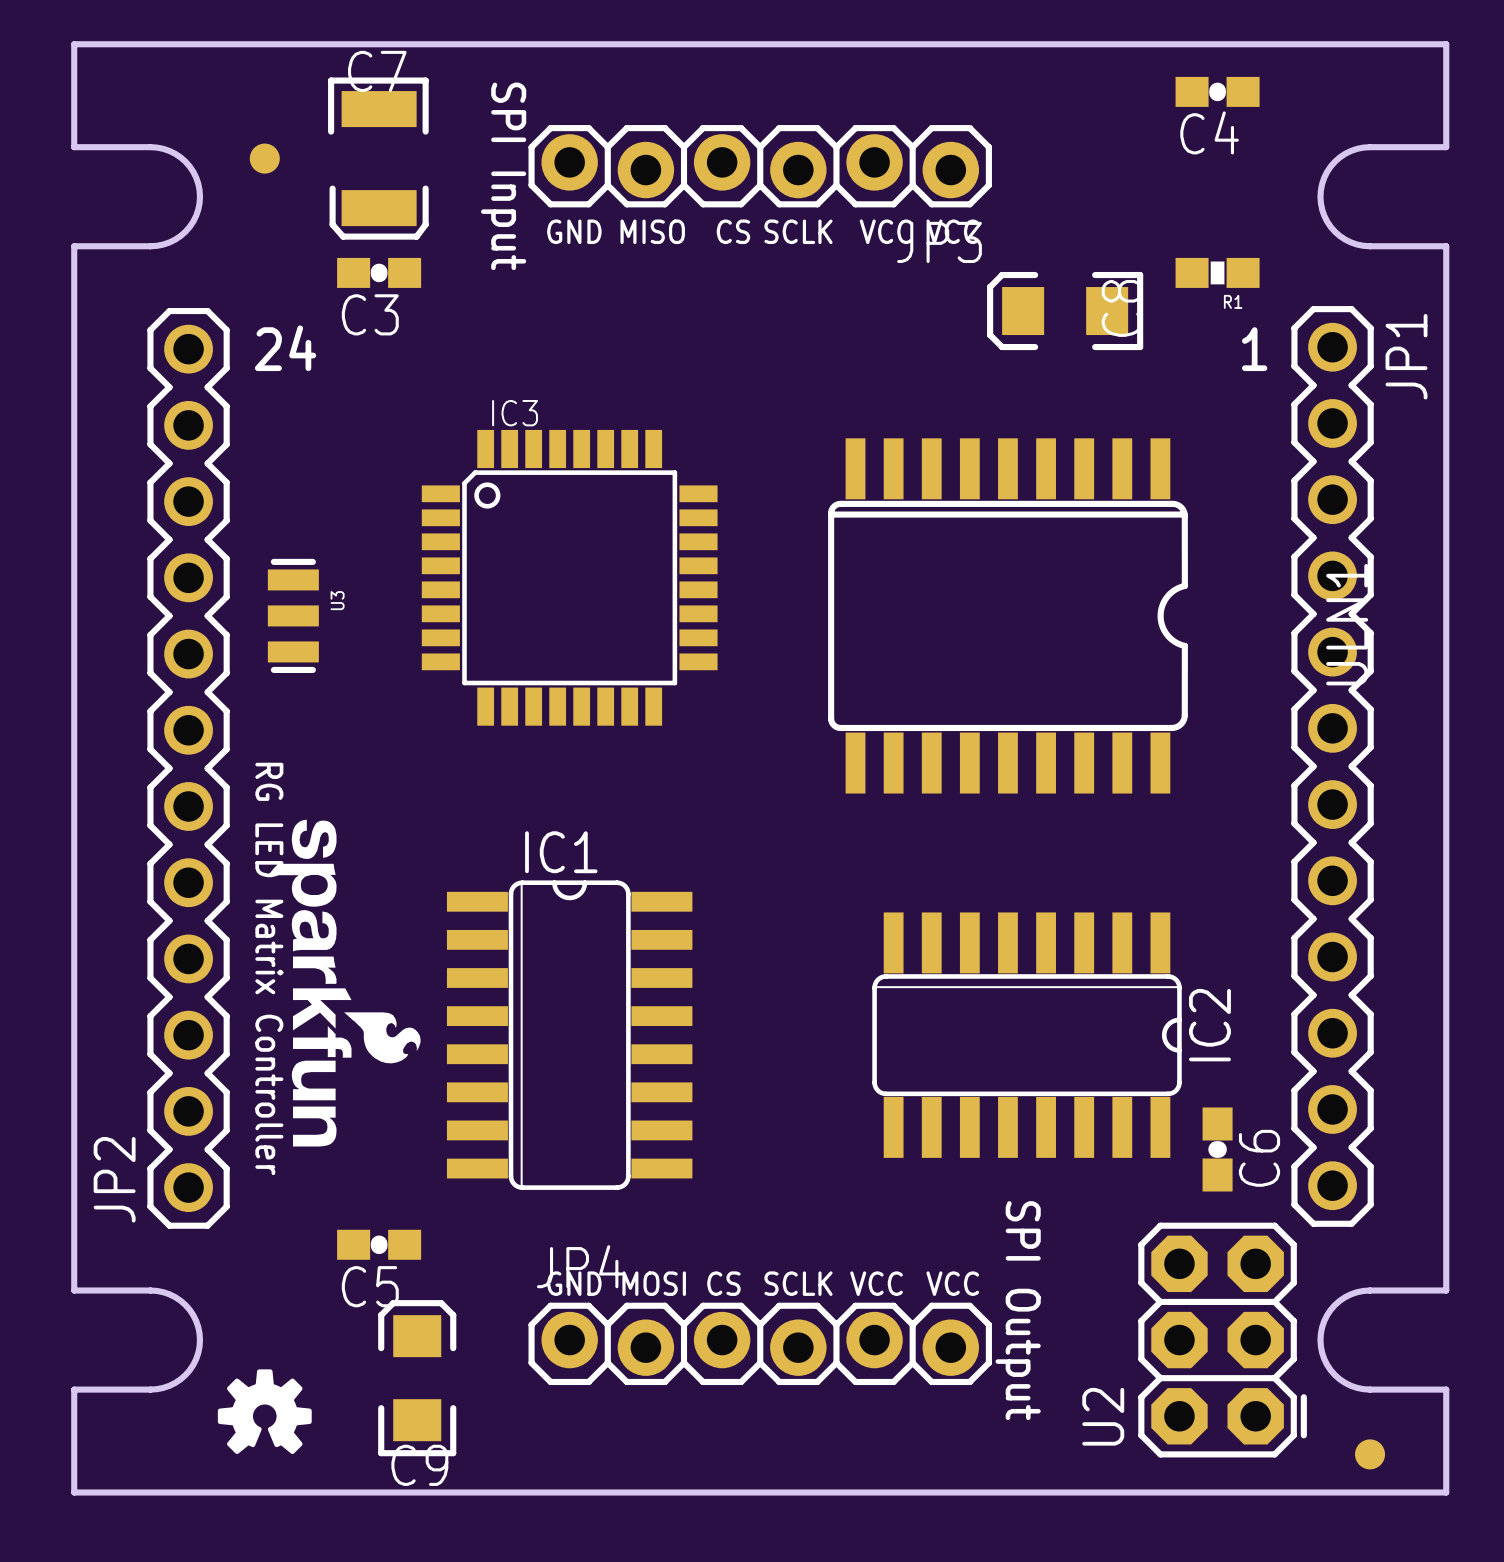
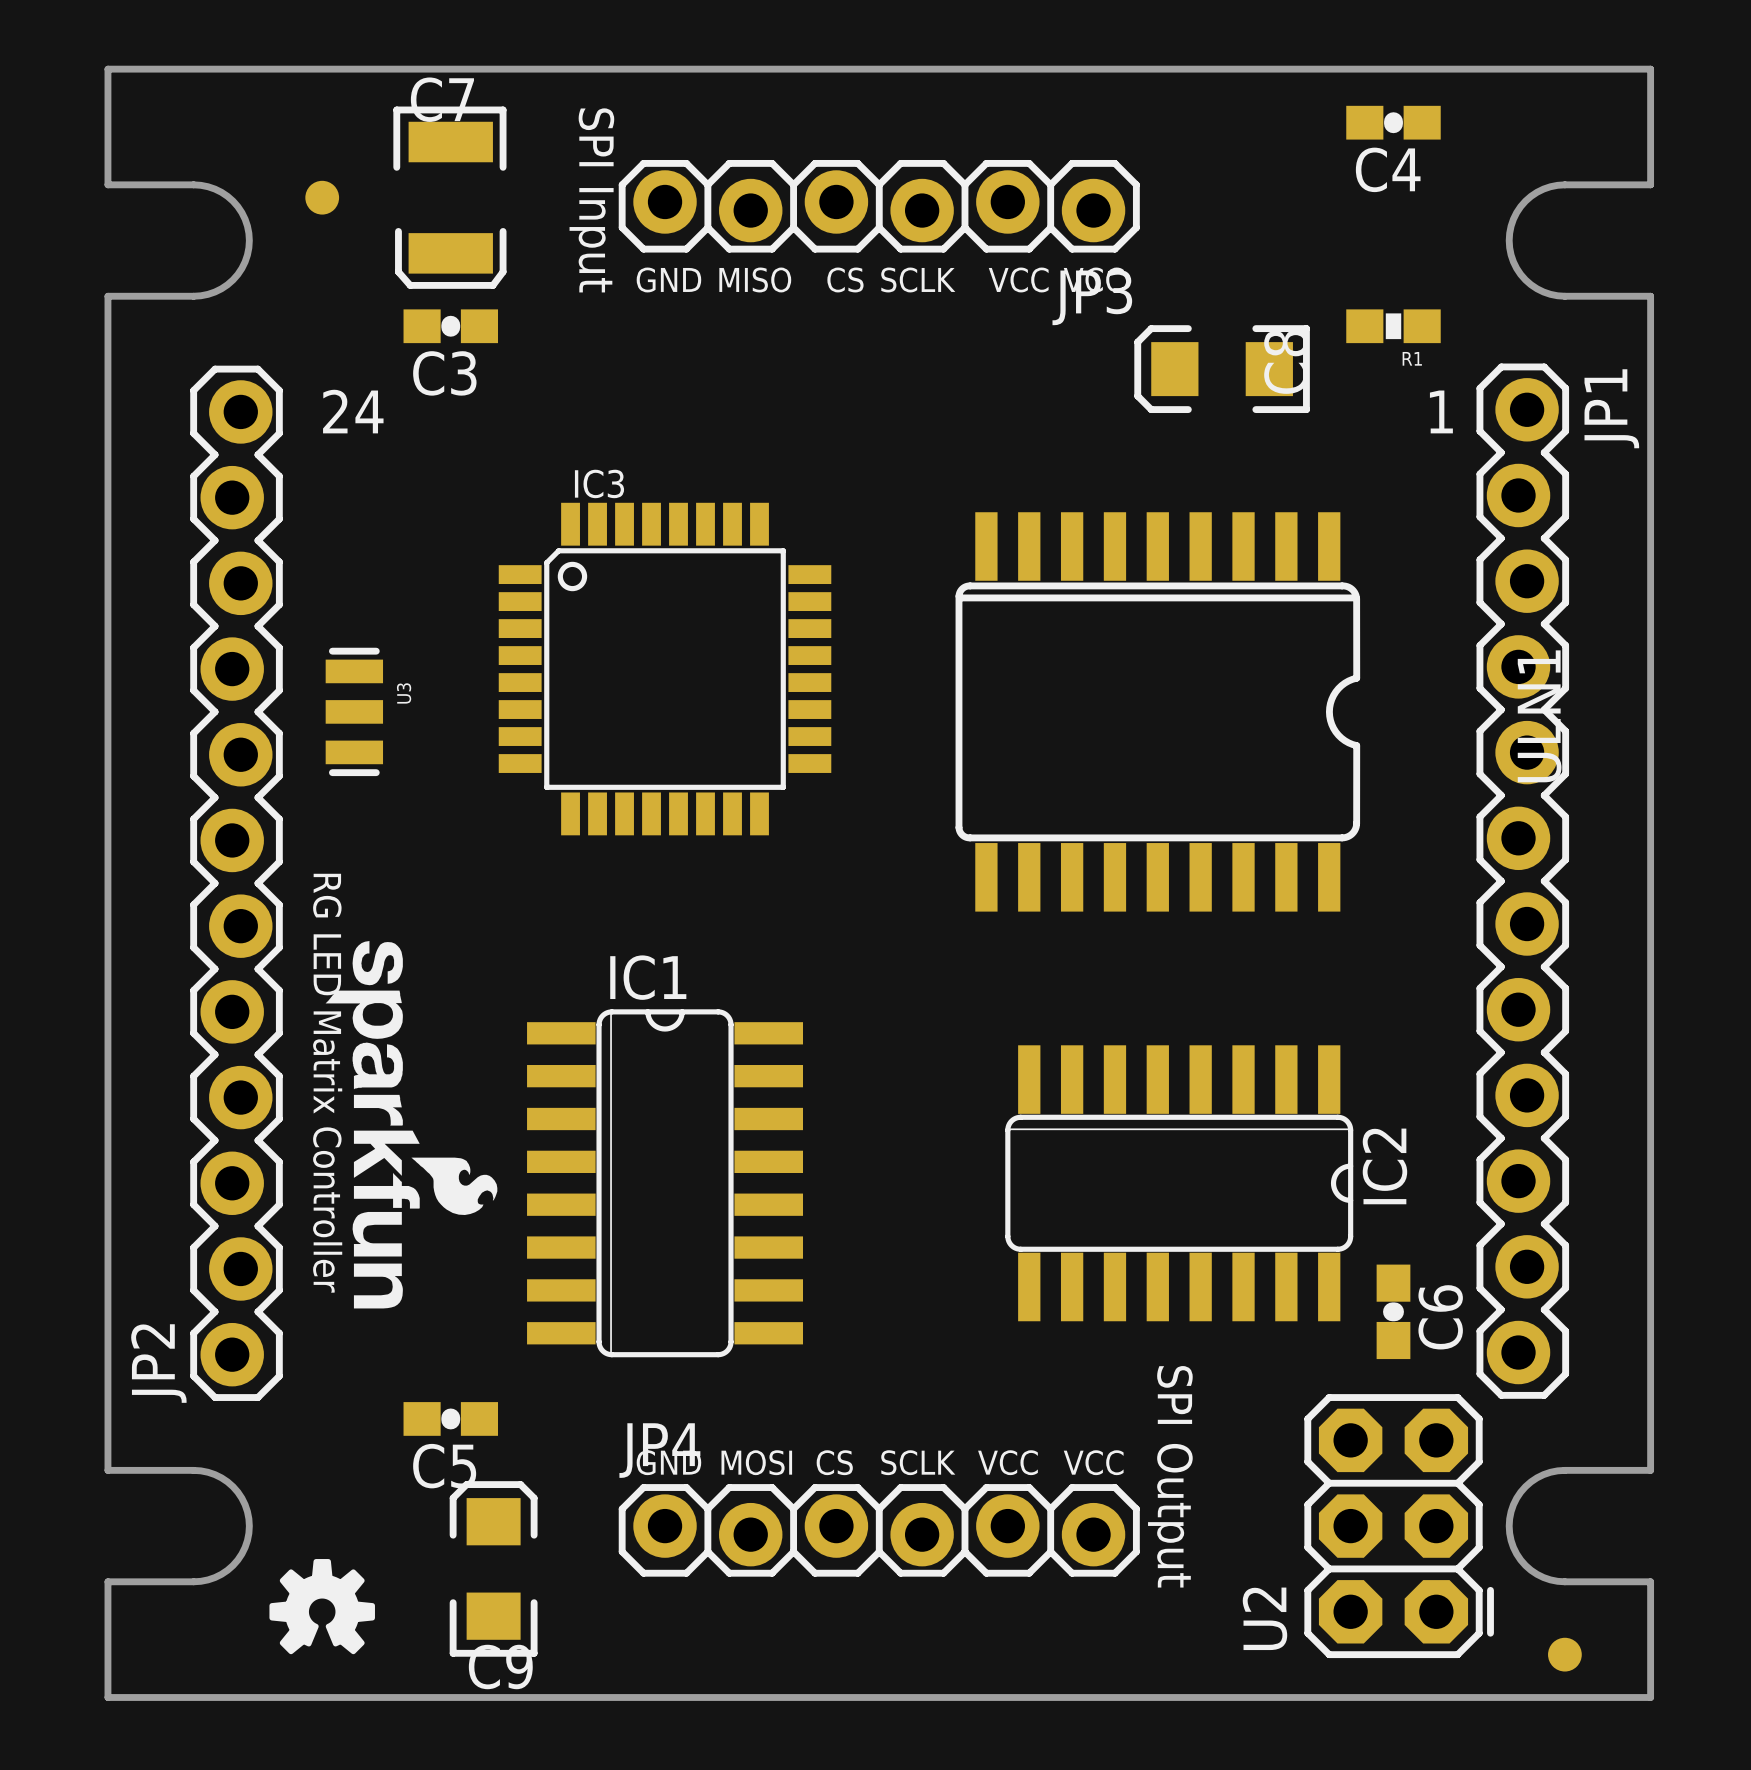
JP1 footprint: [1291, 306, 1374, 1227] -> [1476, 363, 1570, 1399]
JP2 footprint: [147, 307, 230, 1229] -> [190, 365, 283, 1401]

